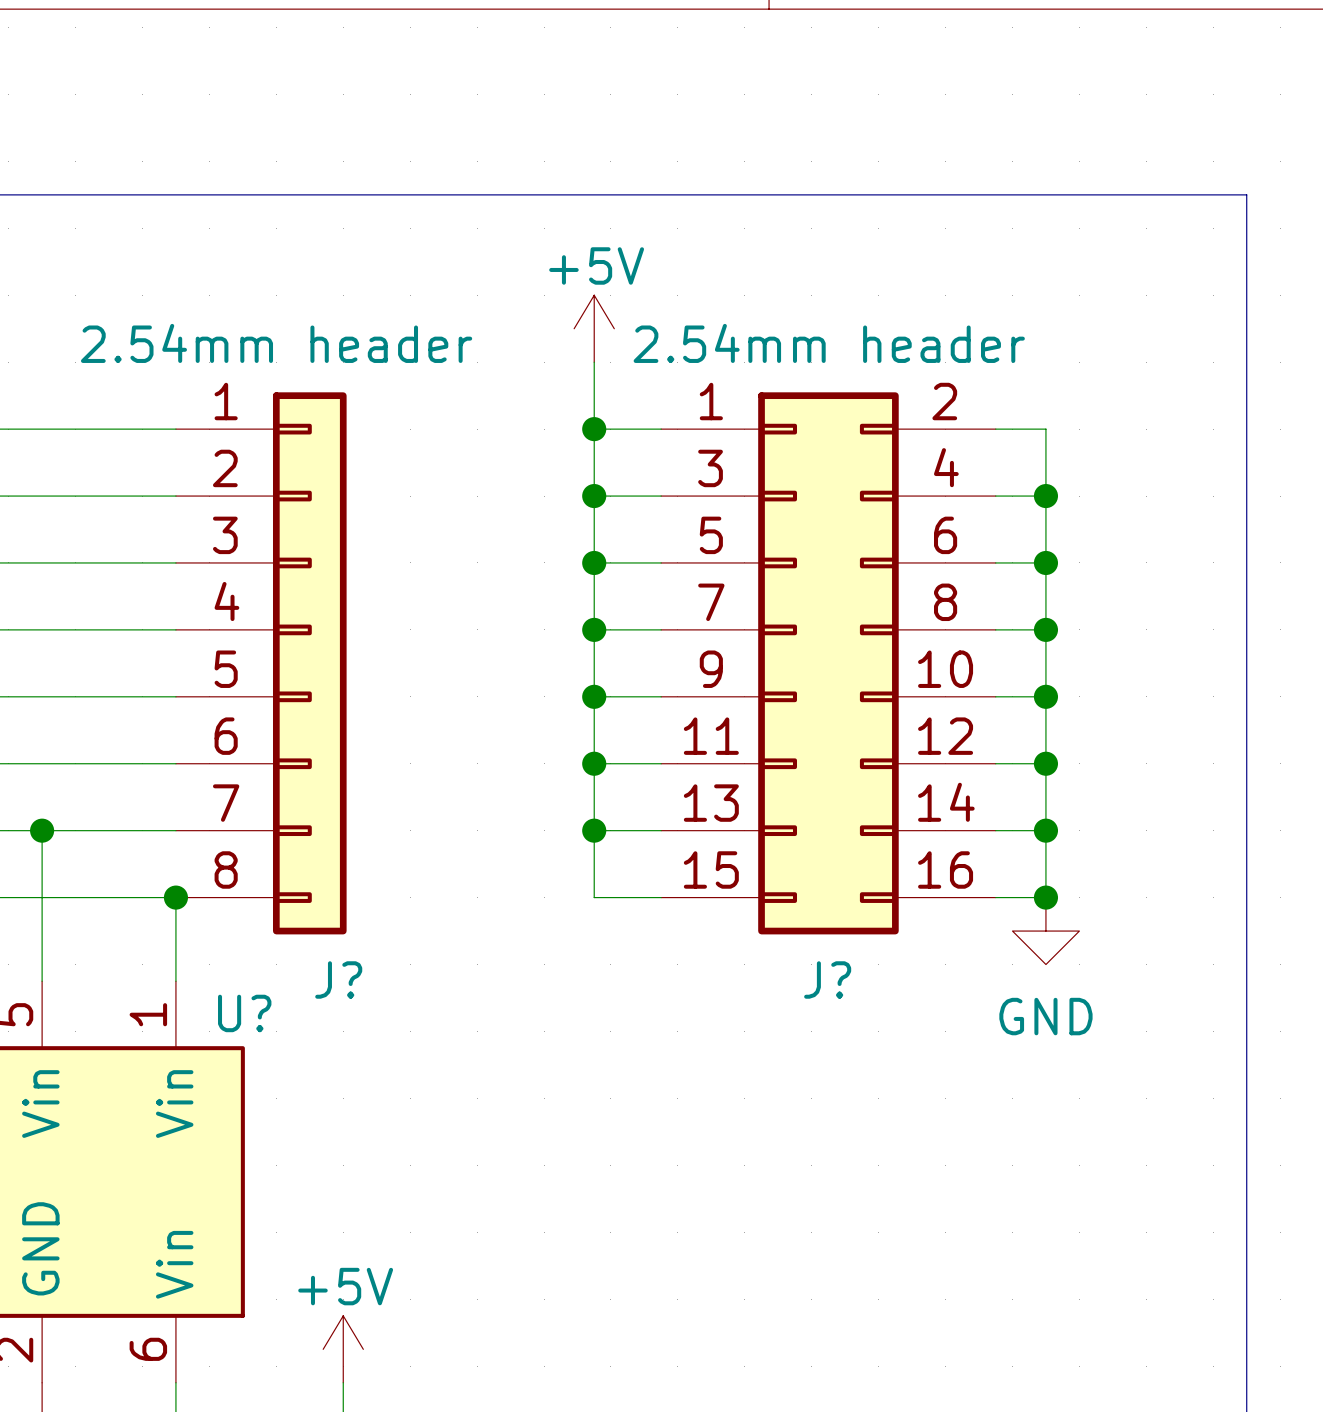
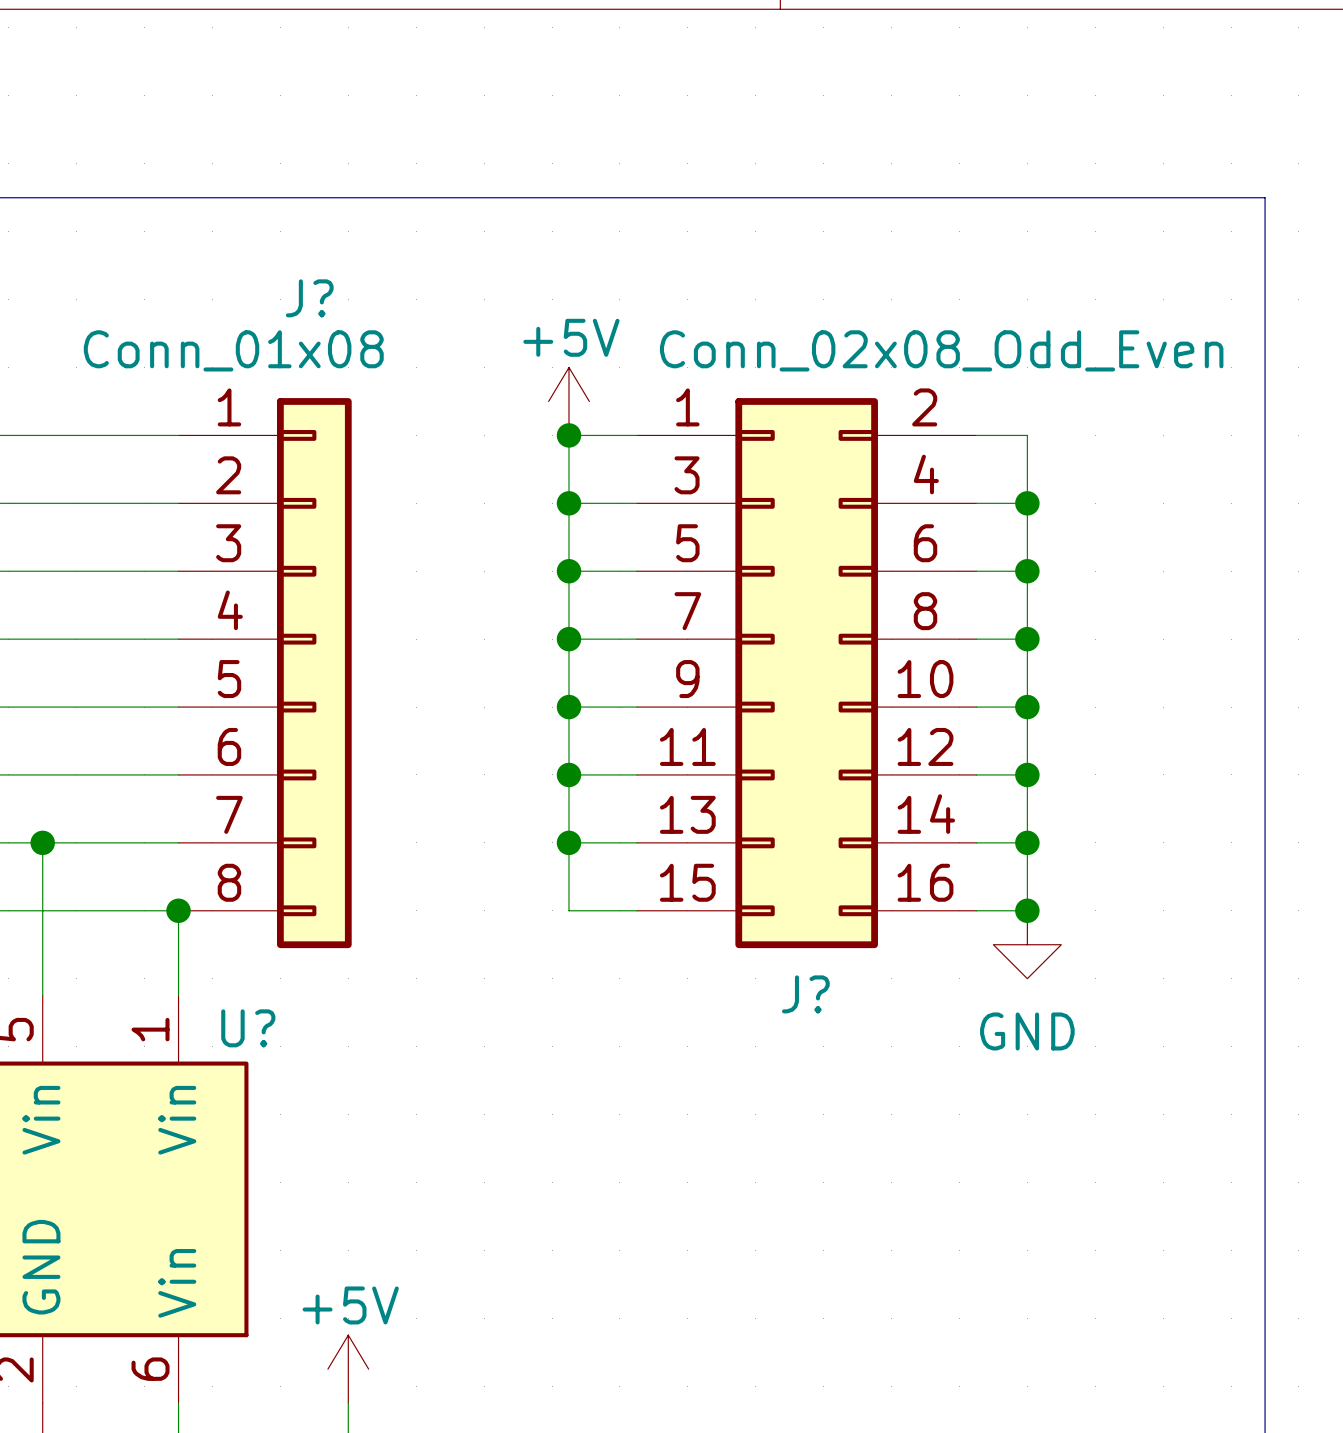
power symbol position: +5V (594, 328) -> +5V (569, 401)
J? value: 2.54mm header (276, 343) -> Conn_01x08 (233, 350)
wire: (594, 362) (594, 897) -> (602, 435) (569, 435) (569, 910) (602, 910)
junction position: (594, 429) -> (569, 435)
wire: (1012, 429) (1045, 429) (1045, 897) (1012, 897) -> (1027, 435) (1027, 910)
junction position: (594, 496) -> (569, 503)
wire: (1012, 496) (1045, 496) -> (569, 503) (602, 503)
junction position: (1045, 496) -> (1027, 503)
junction position: (594, 562) -> (569, 571)
wire: (1012, 562) (1045, 562) -> (569, 571) (602, 571)
junction position: (1045, 562) -> (1027, 571)
junction position: (594, 629) -> (569, 639)
wire: (1012, 629) (1045, 629) -> (569, 639) (602, 639)
junction position: (1045, 629) -> (1027, 639)
J?: none -> Conn_02x08_Odd_Even (806, 673)
J?: 2.54mm header (828, 663) -> none
junction position: (594, 696) -> (569, 707)
wire: (1012, 696) (1045, 696) -> (569, 707) (602, 707)
junction position: (1045, 696) -> (1027, 707)
junction position: (594, 763) -> (569, 774)
wire: (1012, 763) (1045, 763) -> (569, 774) (602, 774)
junction position: (1045, 763) -> (1027, 774)
junction position: (594, 830) -> (569, 842)
wire: (1012, 830) (1045, 830) -> (569, 842) (602, 842)
junction position: (1045, 830) -> (1027, 842)
junction position: (1045, 897) -> (1027, 910)
power symbol position: GND (1045, 931) -> GND (1027, 944)
J? name position: J? (338, 979) -> J? (309, 298)

